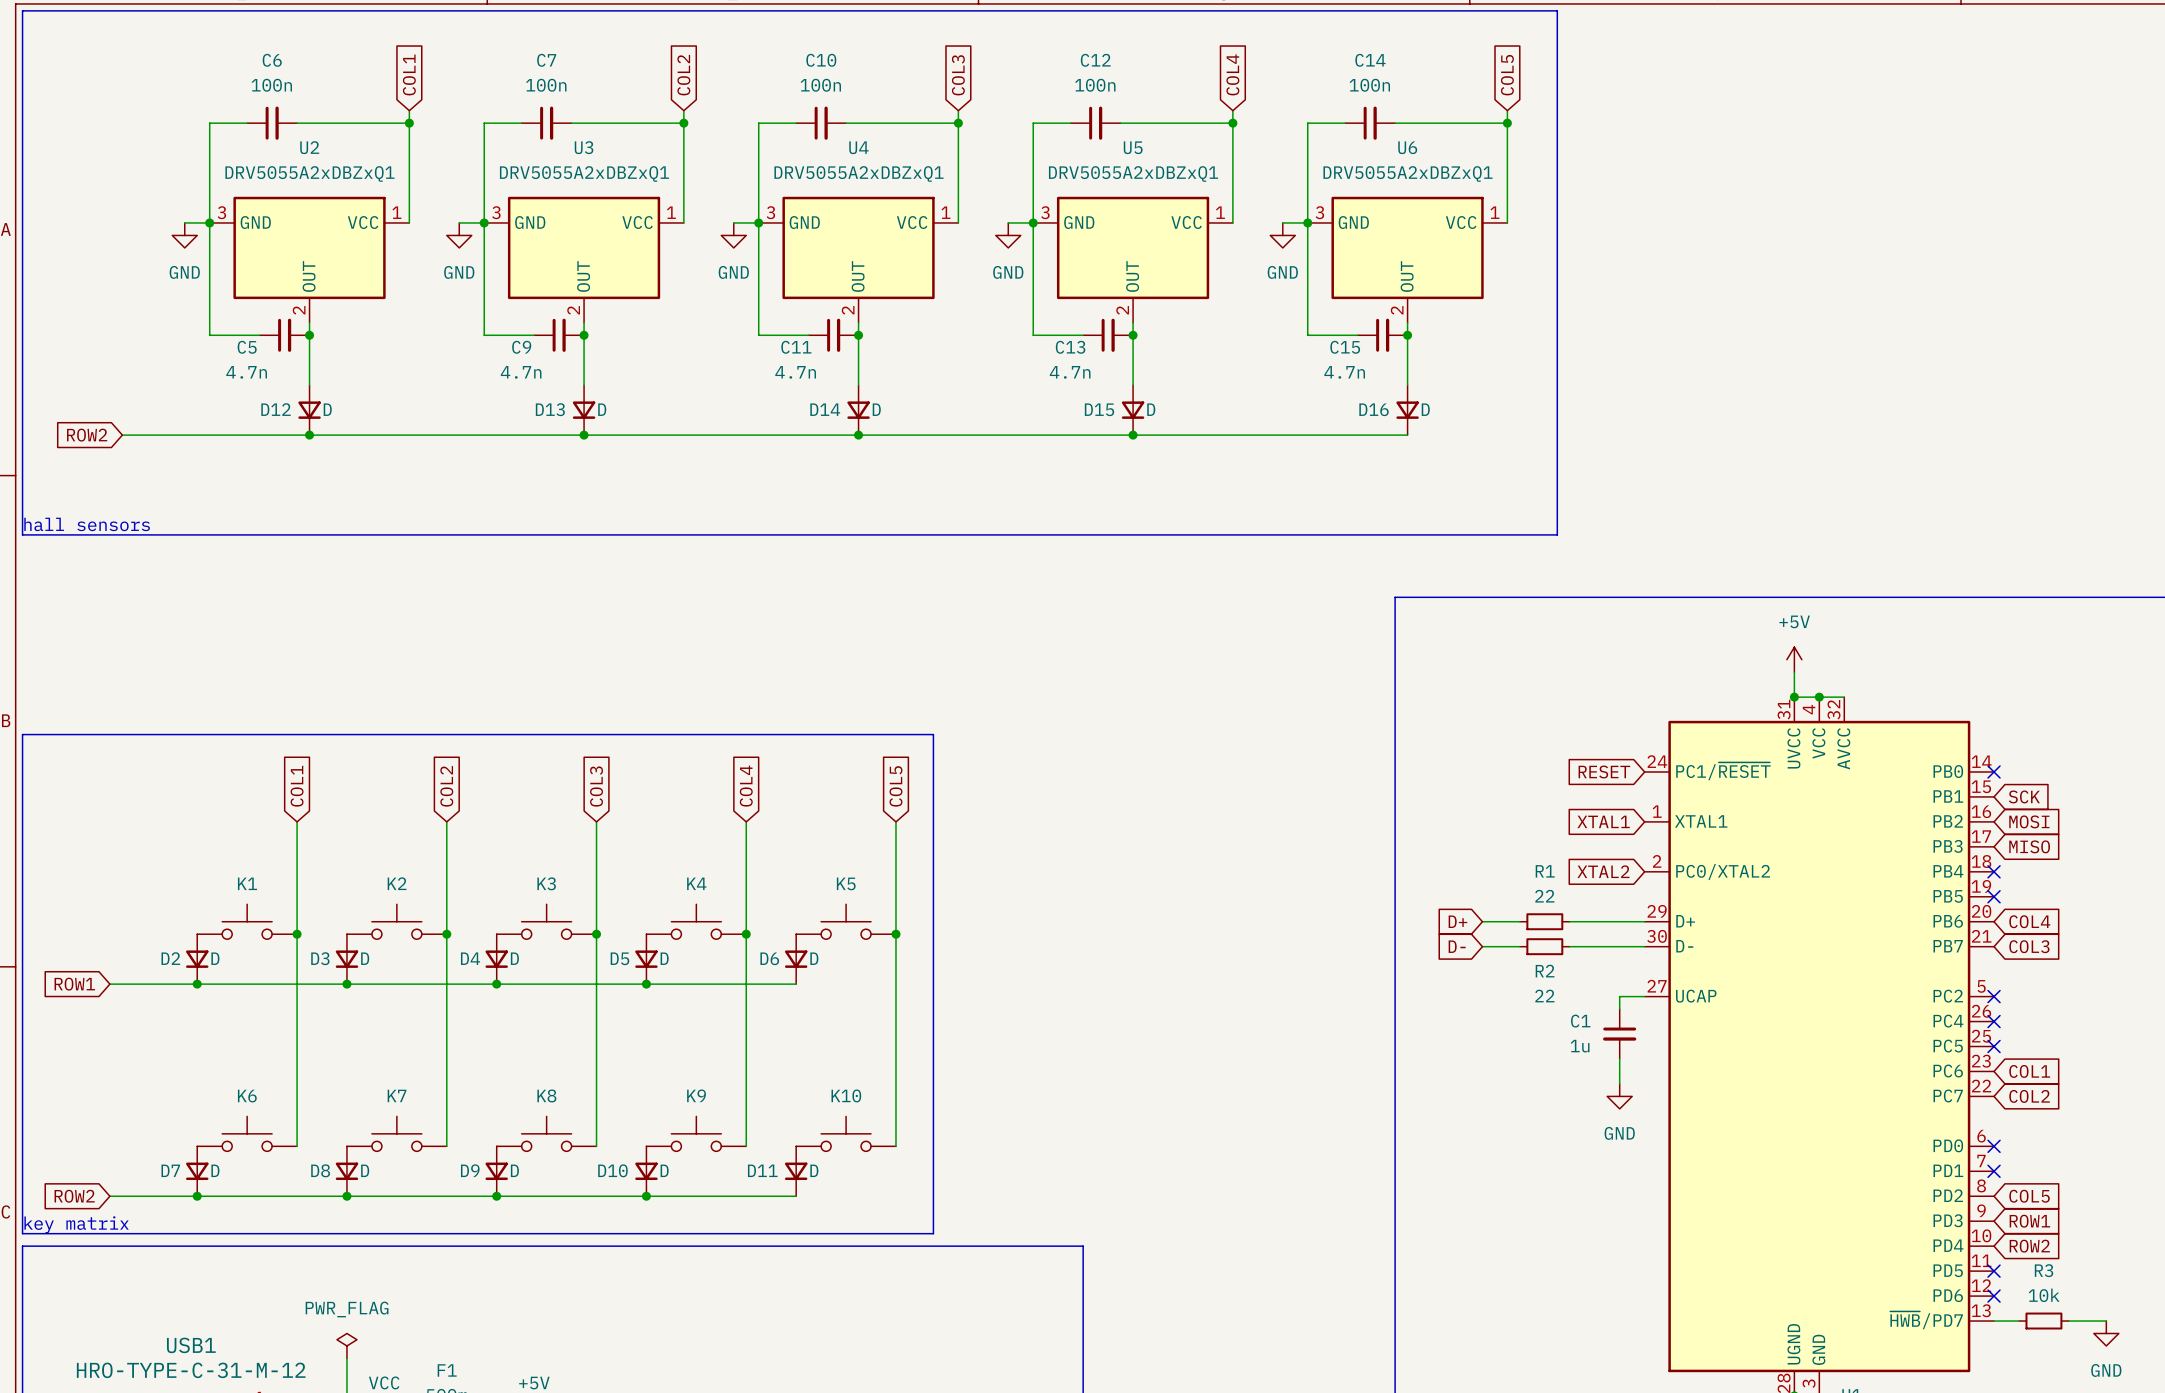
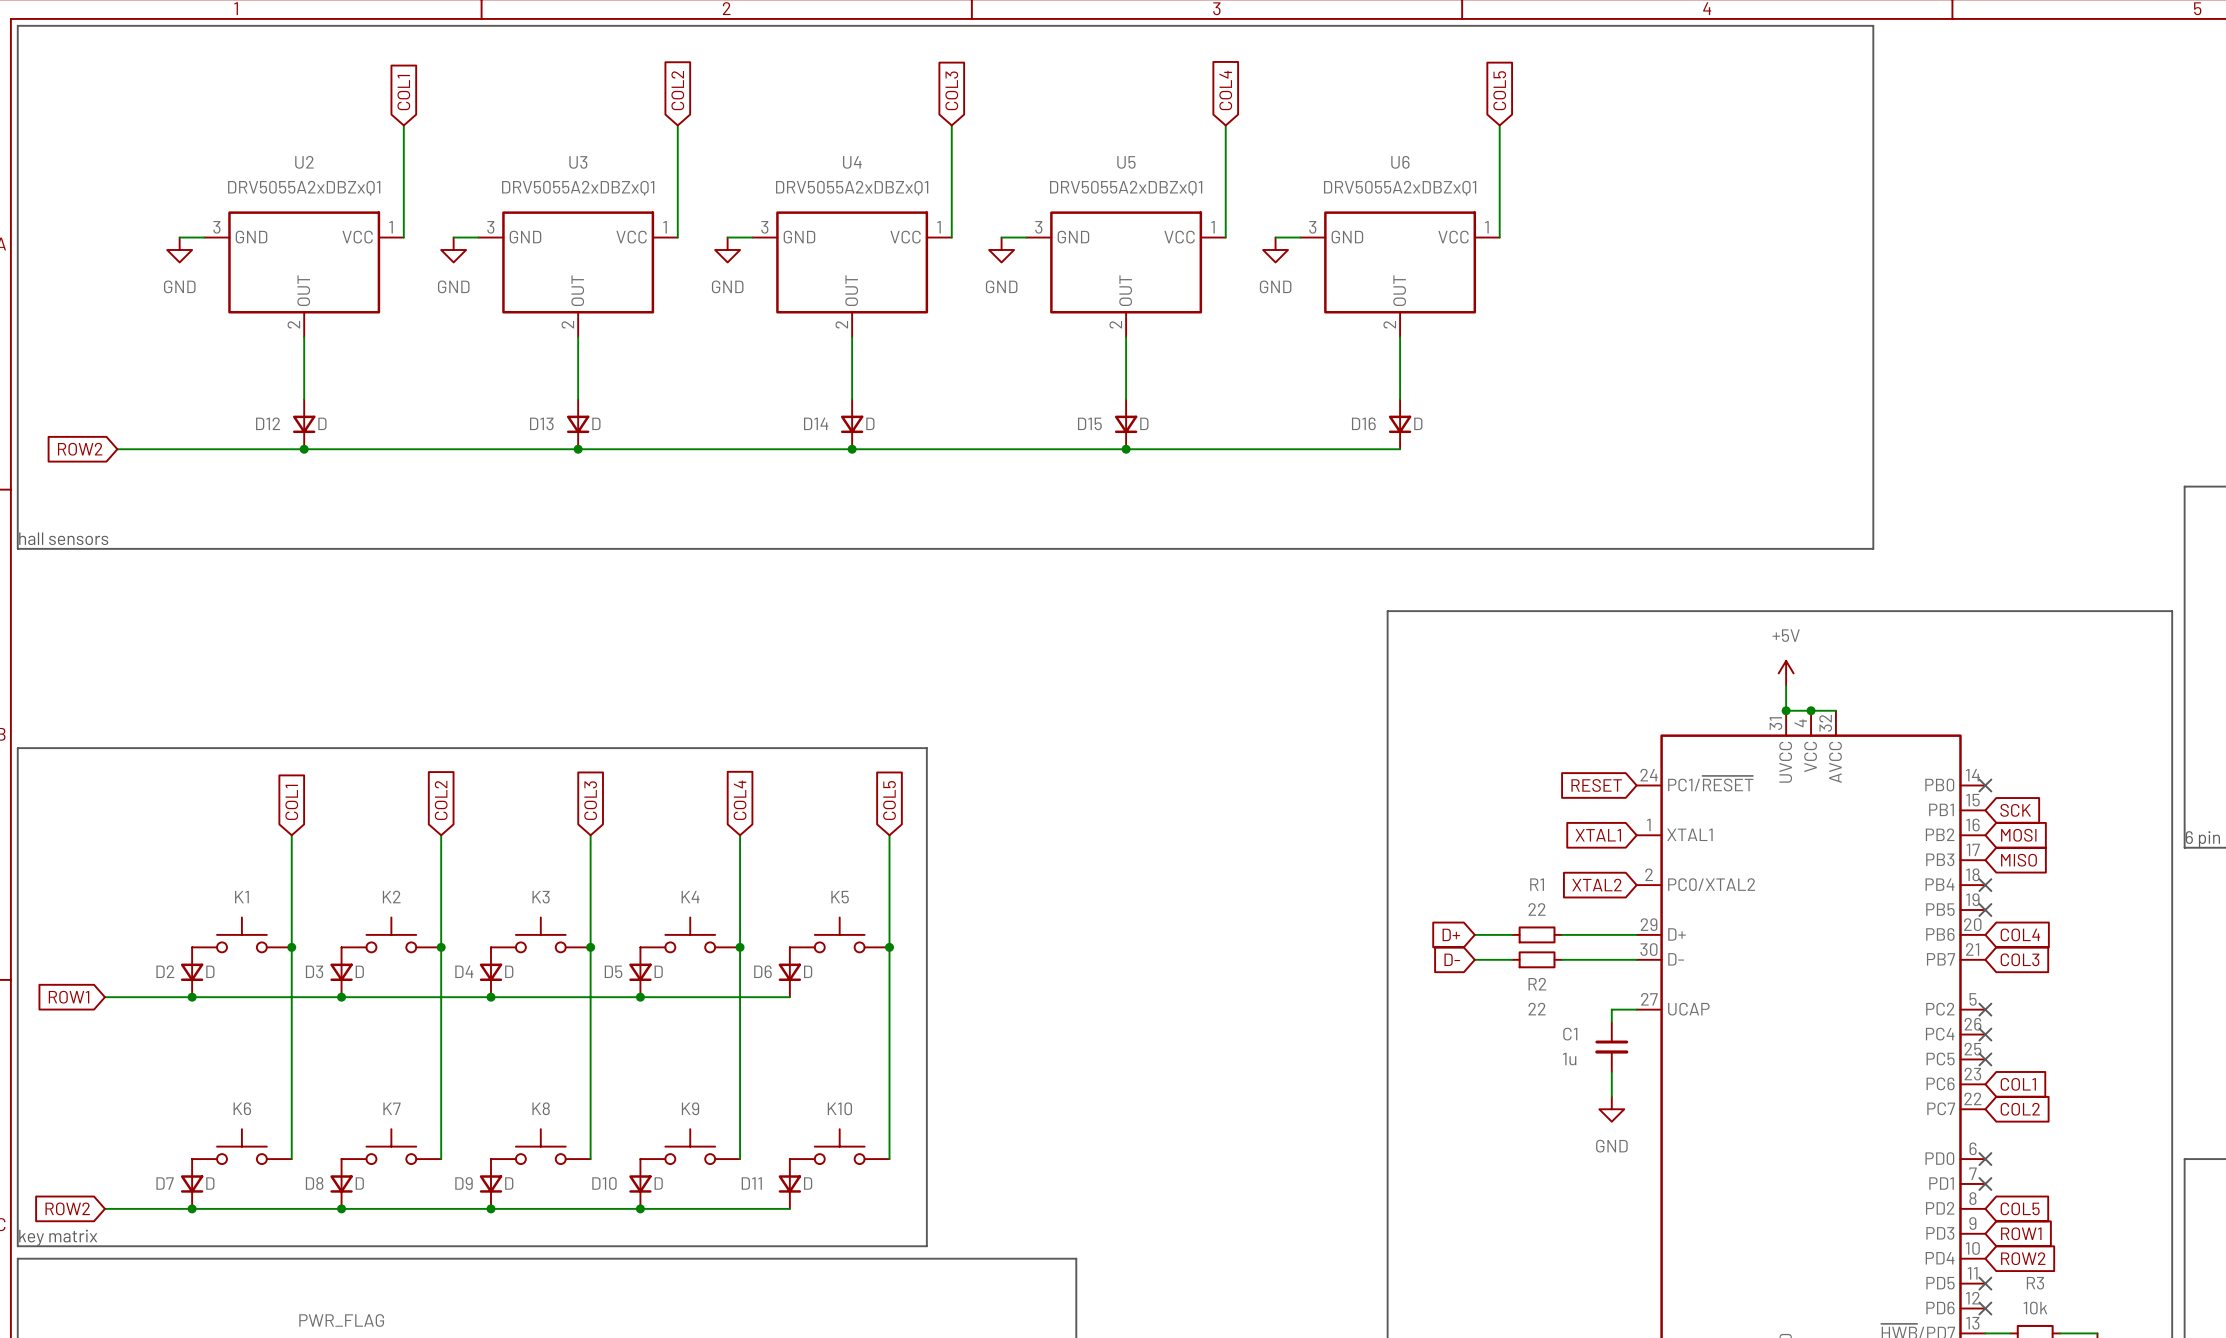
line: (1557, 10) (1557, 534) -> (1549, 25) (1873, 25) (1873, 548) (1549, 548)
wire: (247, 123) (209, 123) (209, 335) (259, 335) -> none
C6: 100n (272, 123) -> none
wire: (297, 123) (409, 123) -> none
junction: (409, 123) -> none
wire: (521, 123) (484, 123) (484, 335) (534, 335) -> none
C7: 100n (546, 123) -> none
wire: (571, 123) (683, 123) -> none
junction: (683, 123) -> none
wire: (796, 123) (758, 123) (758, 335) (808, 335) -> none
C10: 100n (821, 123) -> none
wire: (846, 123) (958, 123) -> none
junction: (958, 123) -> none
wire: (1070, 123) (1033, 123) (1033, 335) (1083, 335) -> none
C12: 100n (1095, 123) -> none
wire: (1120, 123) (1232, 123) -> none
junction: (1232, 123) -> none
wire: (1345, 123) (1307, 123) (1307, 335) (1357, 335) -> none
C14: 100n (1370, 123) -> none
wire: (1395, 123) (1507, 123) -> none
junction: (1507, 123) -> none
junction: (209, 222) -> none
junction: (484, 222) -> none
junction: (758, 222) -> none
junction: (1033, 222) -> none
junction: (1307, 222) -> none
C5: 4.7n (284, 335) -> none
junction: (309, 335) -> none
C9: 4.7n (559, 335) -> none
junction: (584, 335) -> none
C11: 4.7n (833, 335) -> none
junction: (858, 335) -> none
C13: 4.7n (1108, 335) -> none
junction: (1133, 335) -> none
C15: 4.7n (1382, 335) -> none
junction: (1407, 335) -> none

